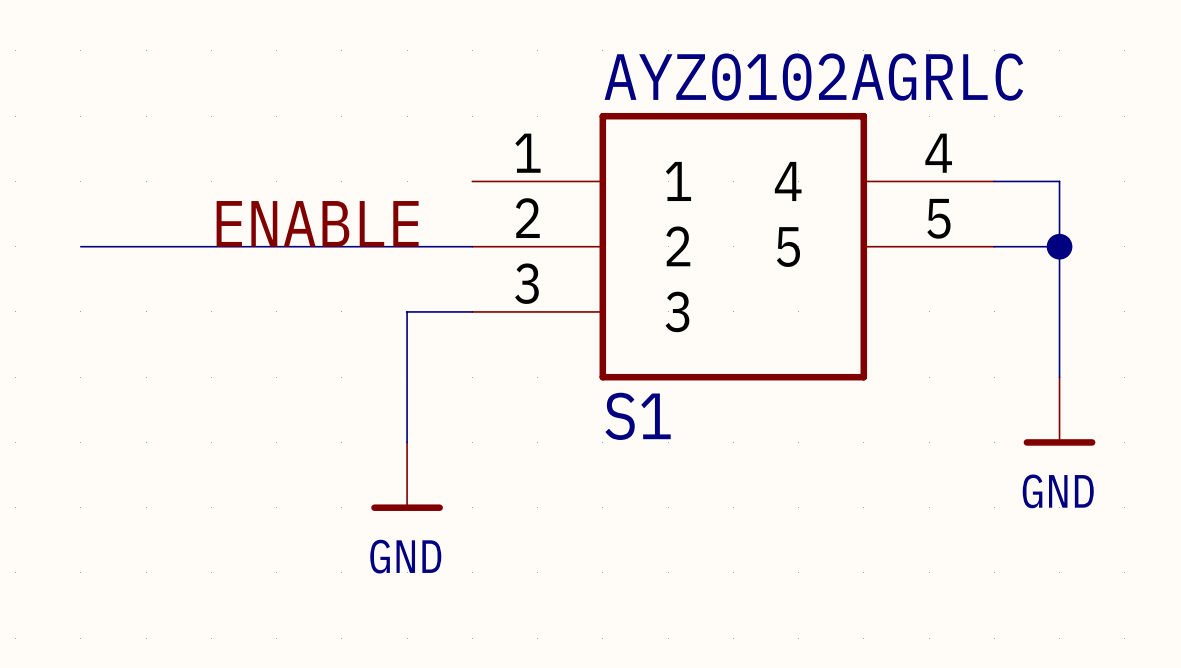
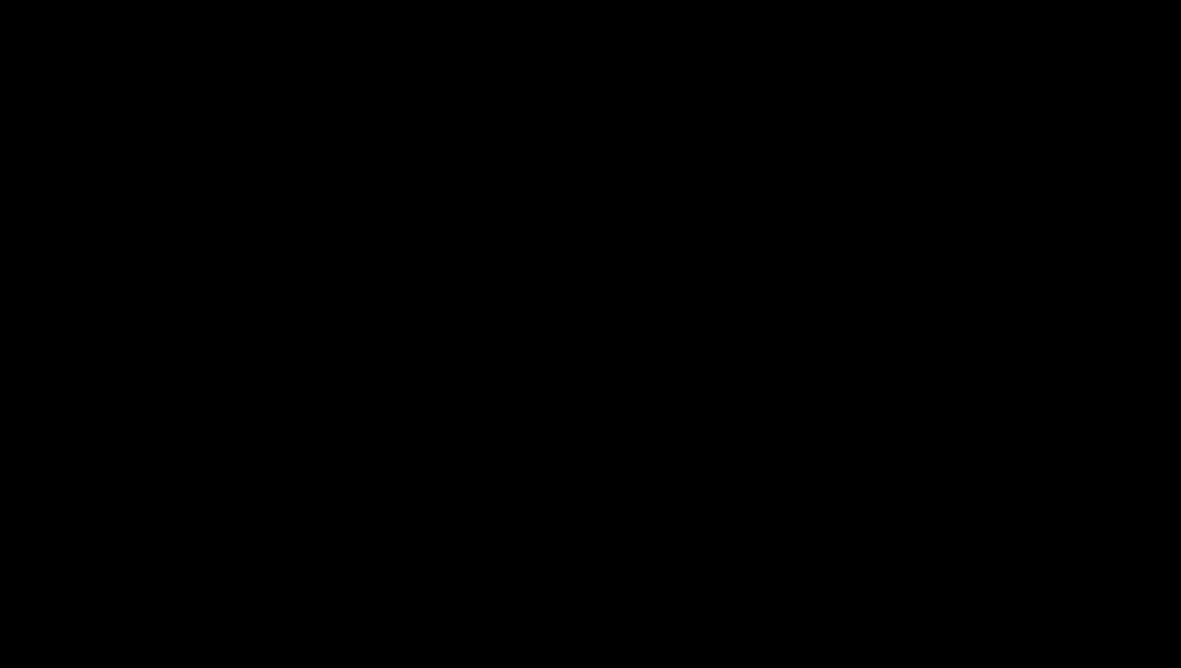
wire: (994, 181) (1059, 181) (1059, 377) -> none
label: ENABLE (317, 223) -> none
wire: (80, 246) (472, 246) -> none
S1: AYZ0102AGRLC (733, 246) -> none
wire: (994, 246) (1059, 246) -> none
junction: (1059, 246) -> none
wire: (472, 311) (407, 311) (407, 442) -> none
power symbol: GND (1059, 411) -> none
power symbol: GND (407, 476) -> none

